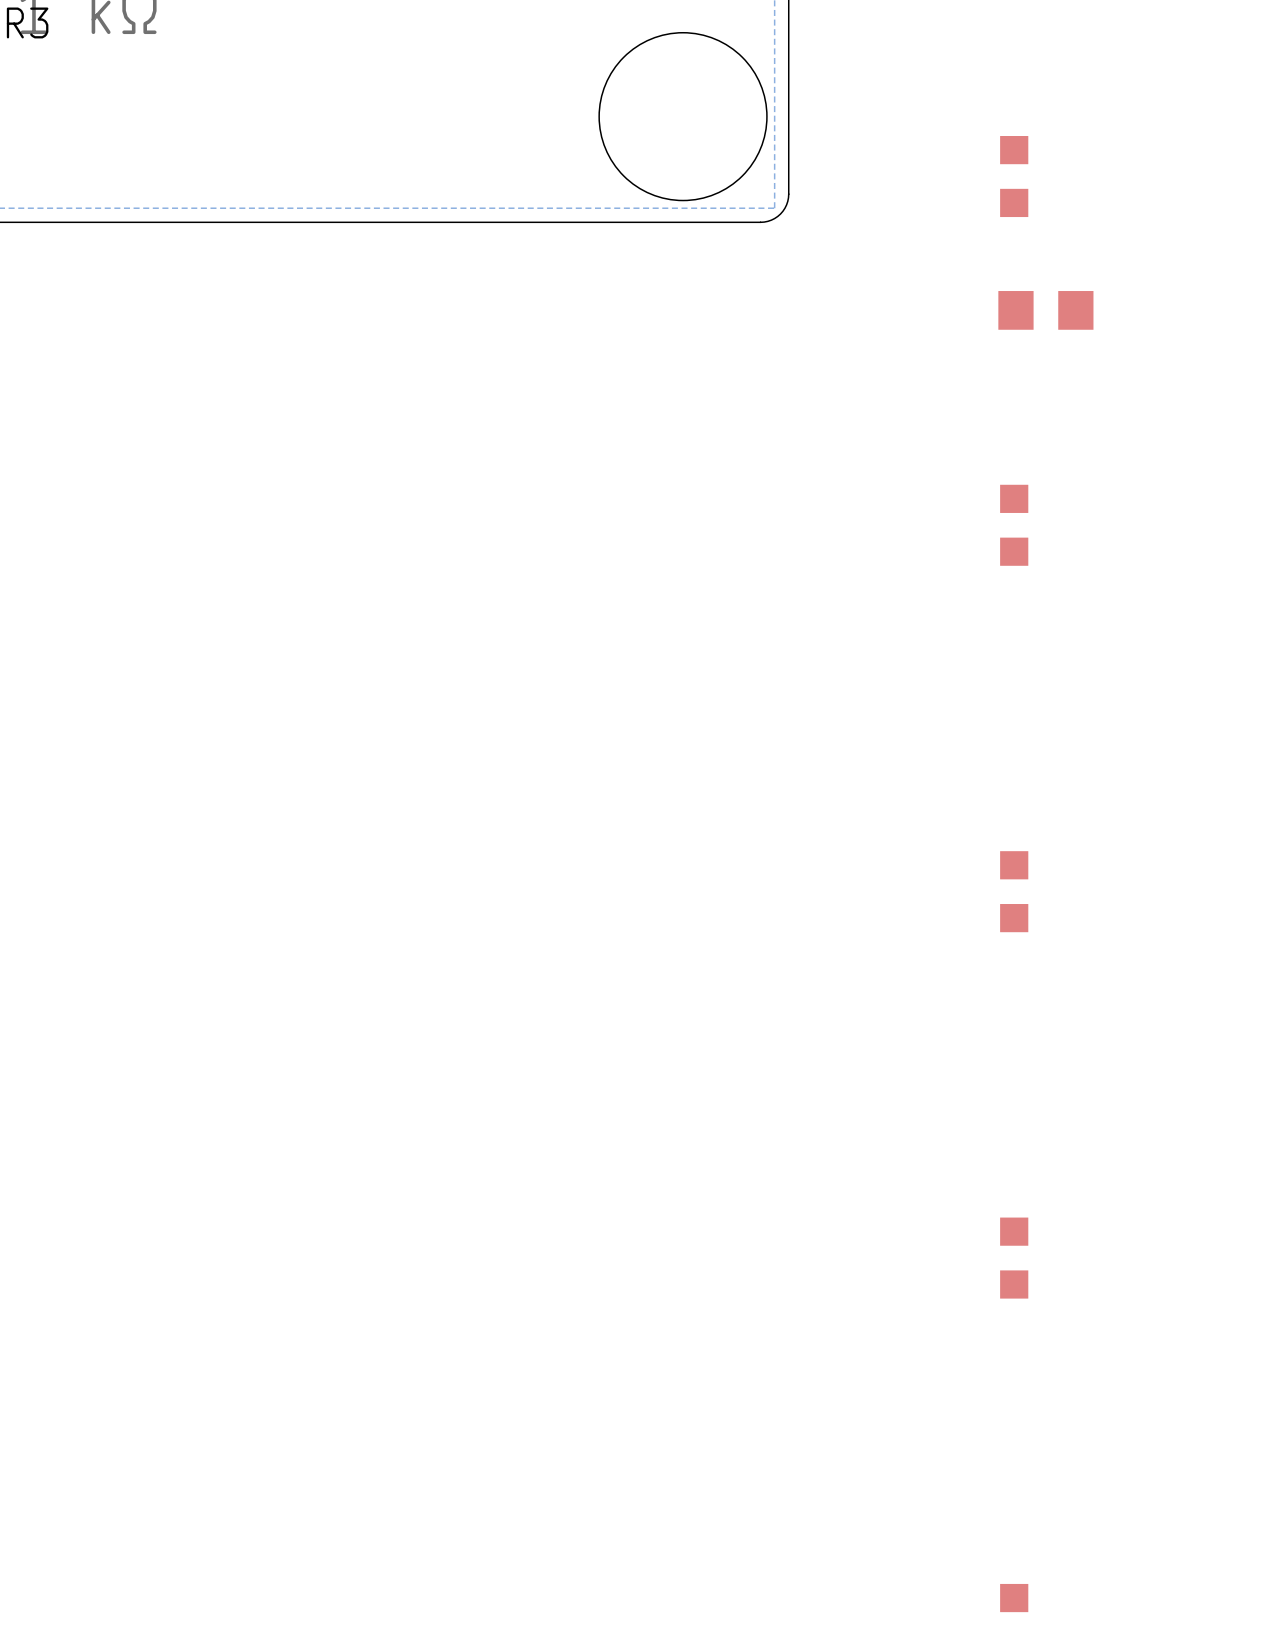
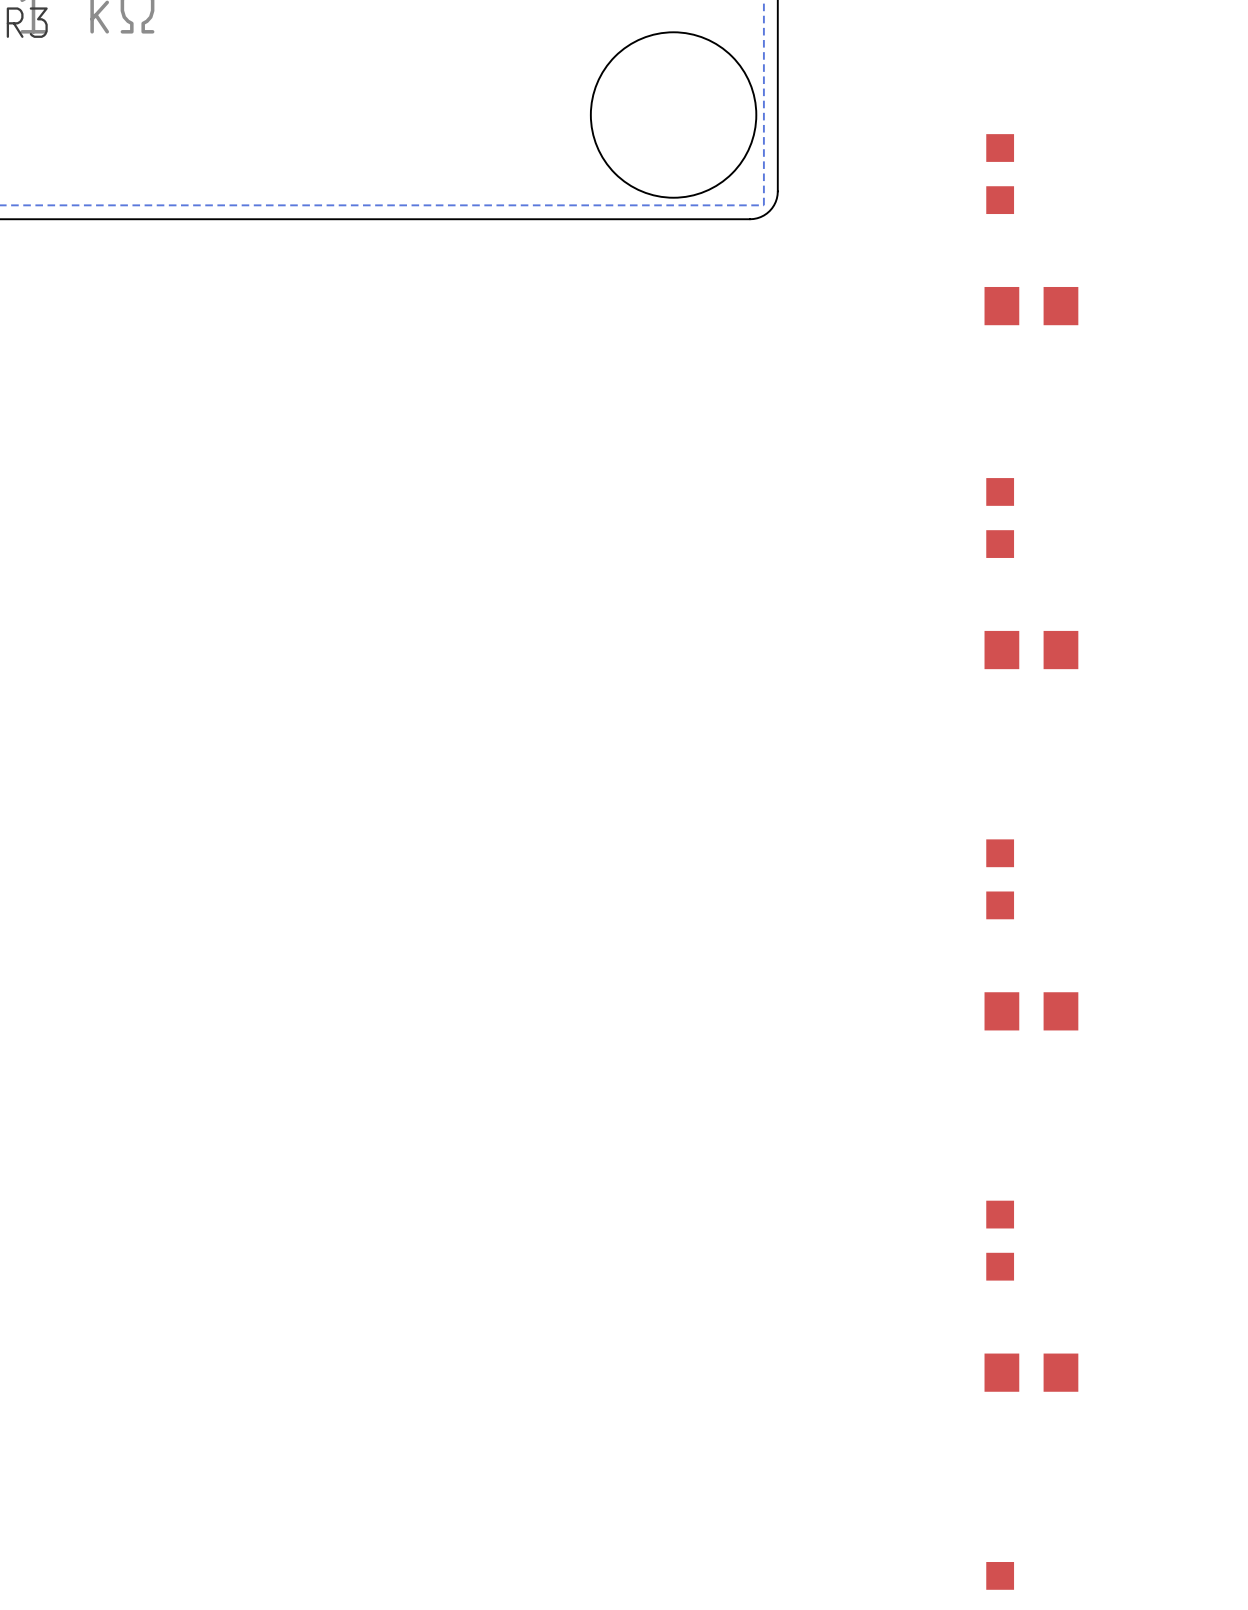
part: none -> (1031, 650)
part: none -> (1031, 1011)
part: none -> (1031, 1372)

